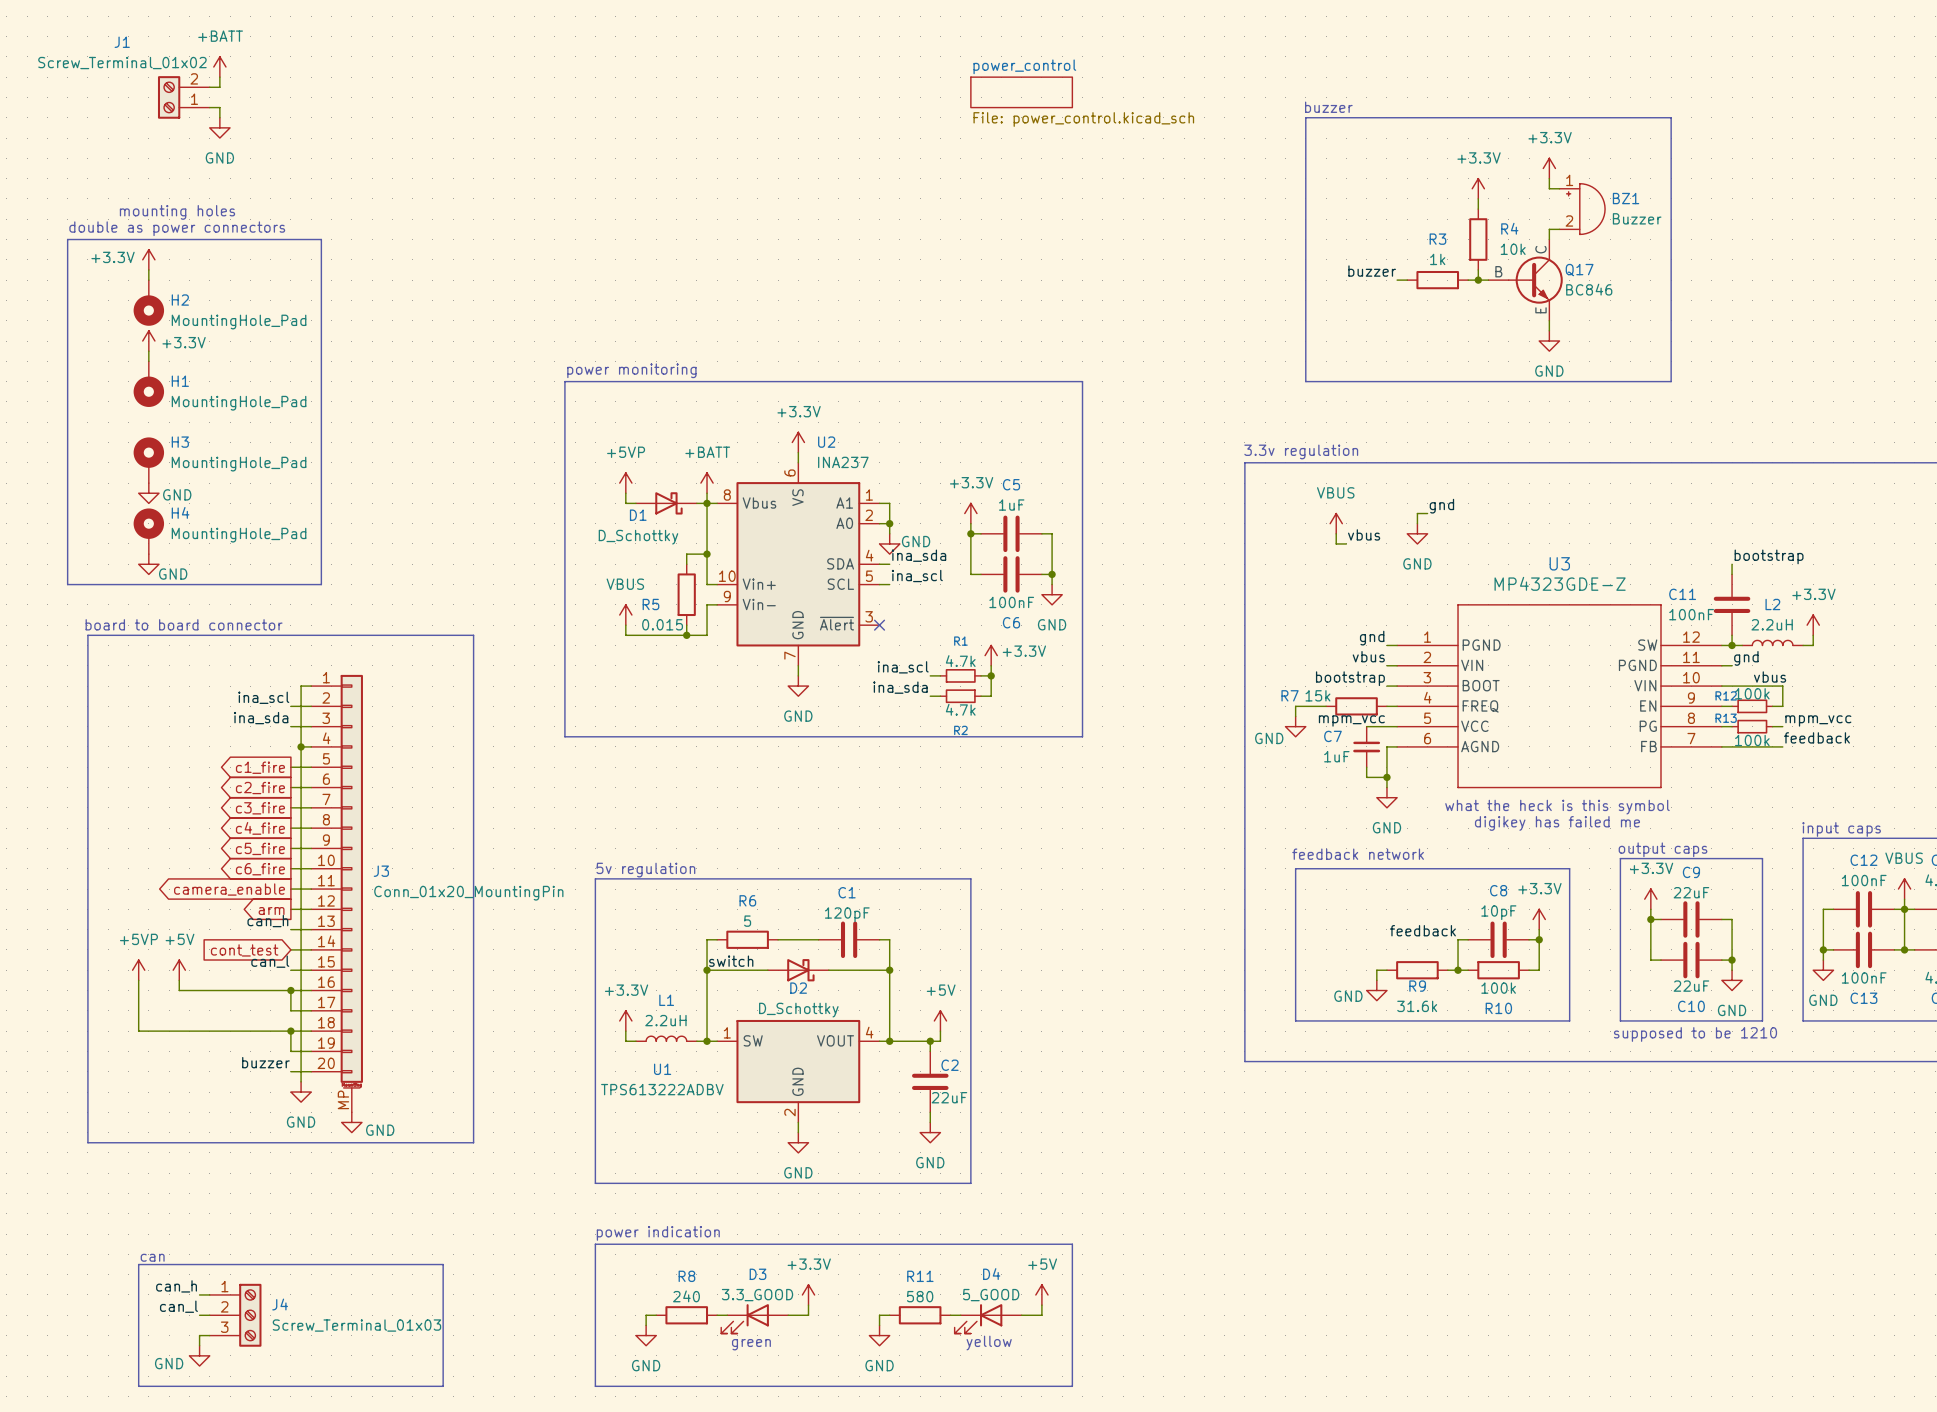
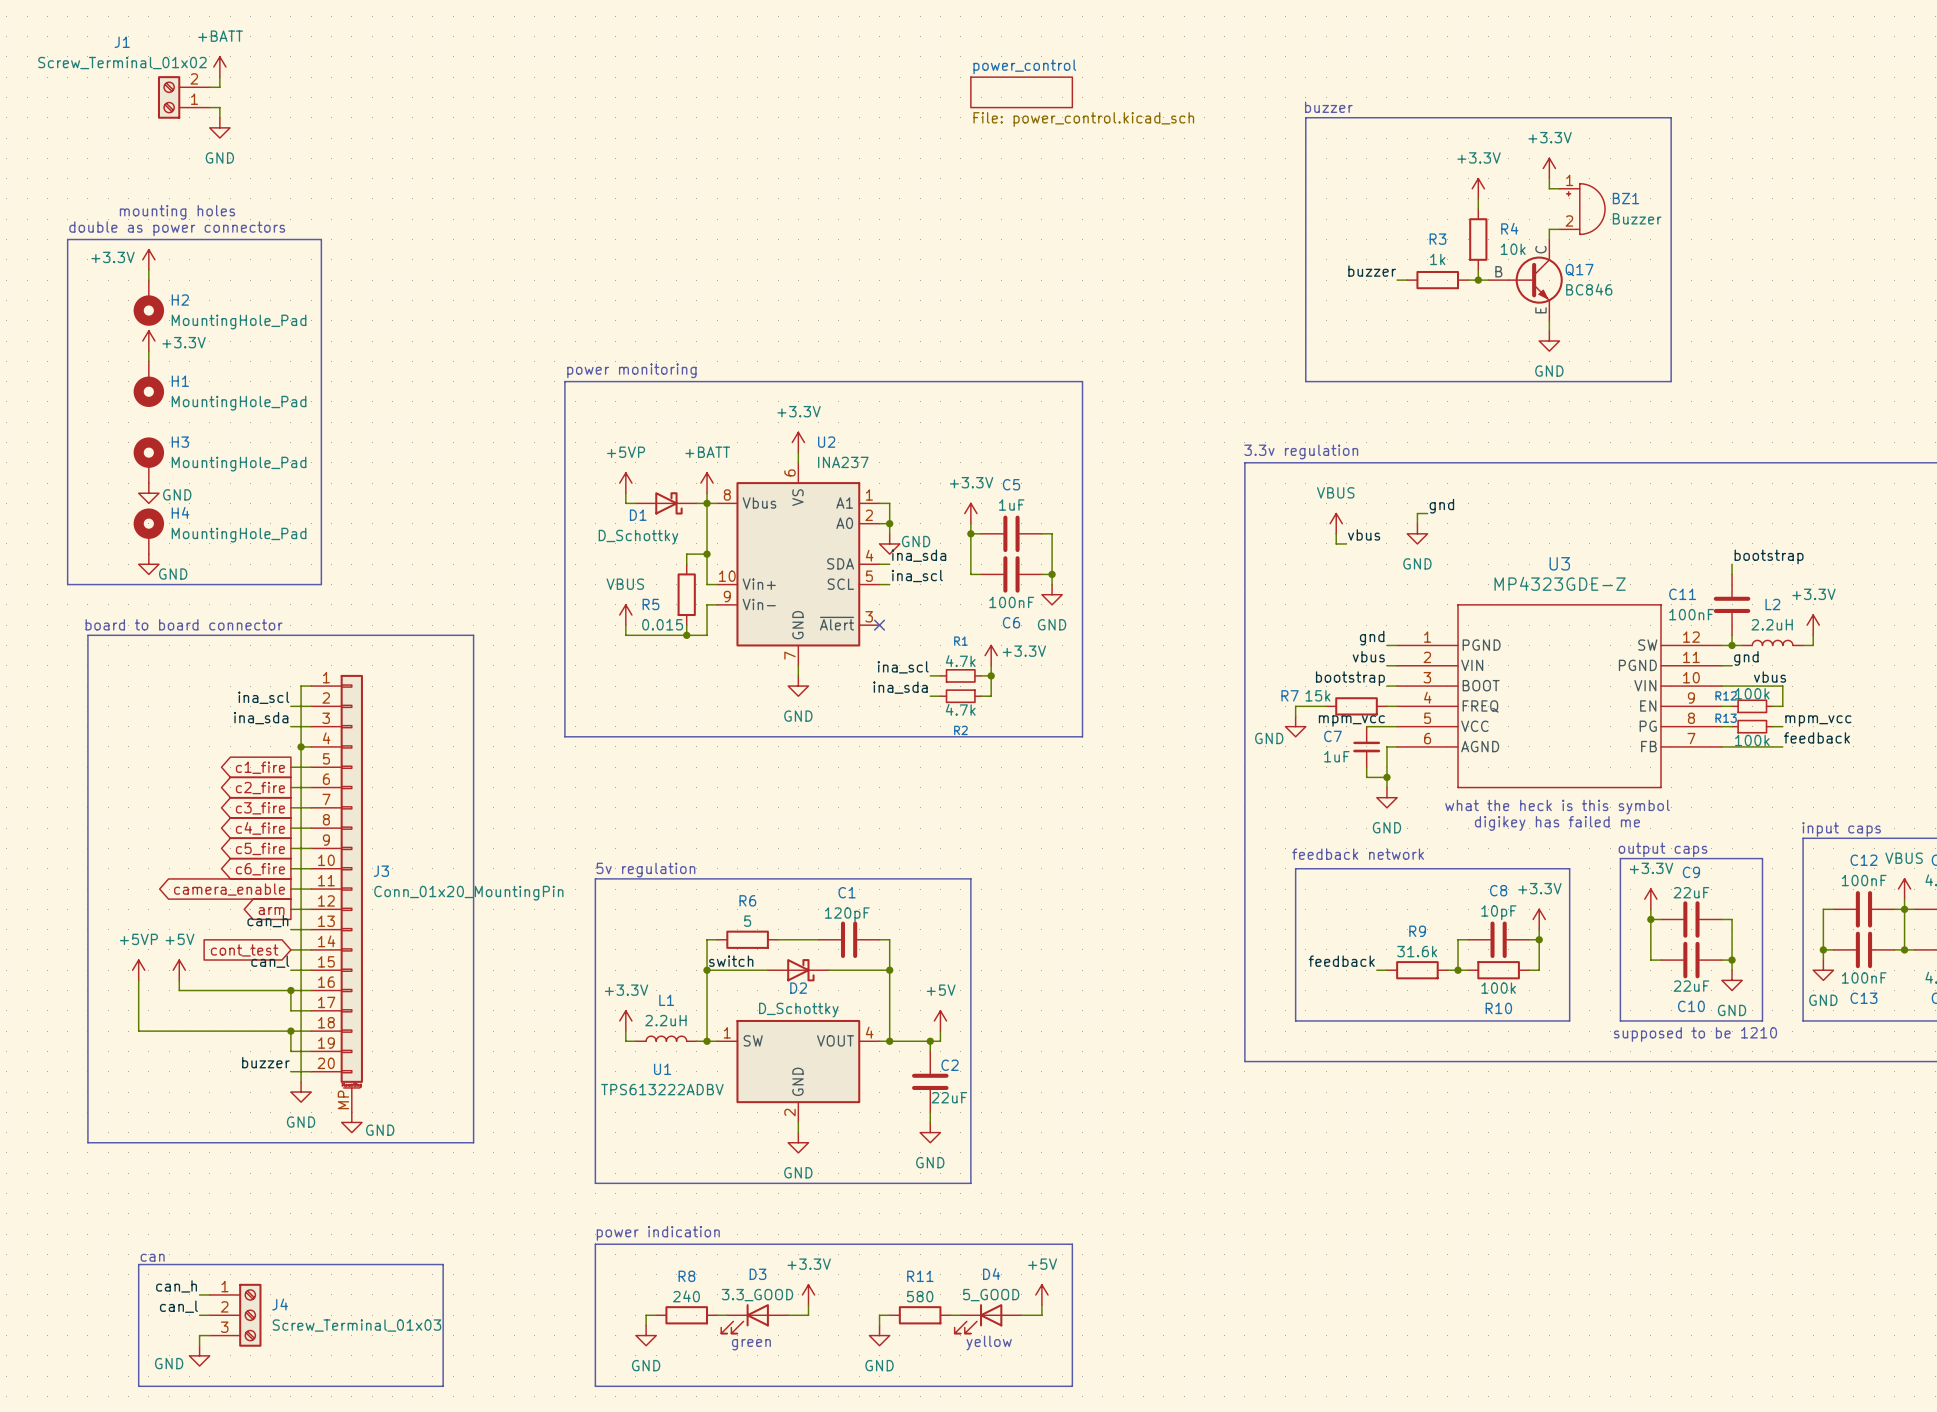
label position: feedback (1422, 930) -> feedback (1341, 961)
wire: (1376, 970) (1376, 980) -> none
R9 name position: R9 (1417, 986) -> R9 (1417, 931)
power symbol: GND (1376, 990) -> none
R9 value position: 31.6k (1417, 1006) -> 31.6k (1417, 951)

